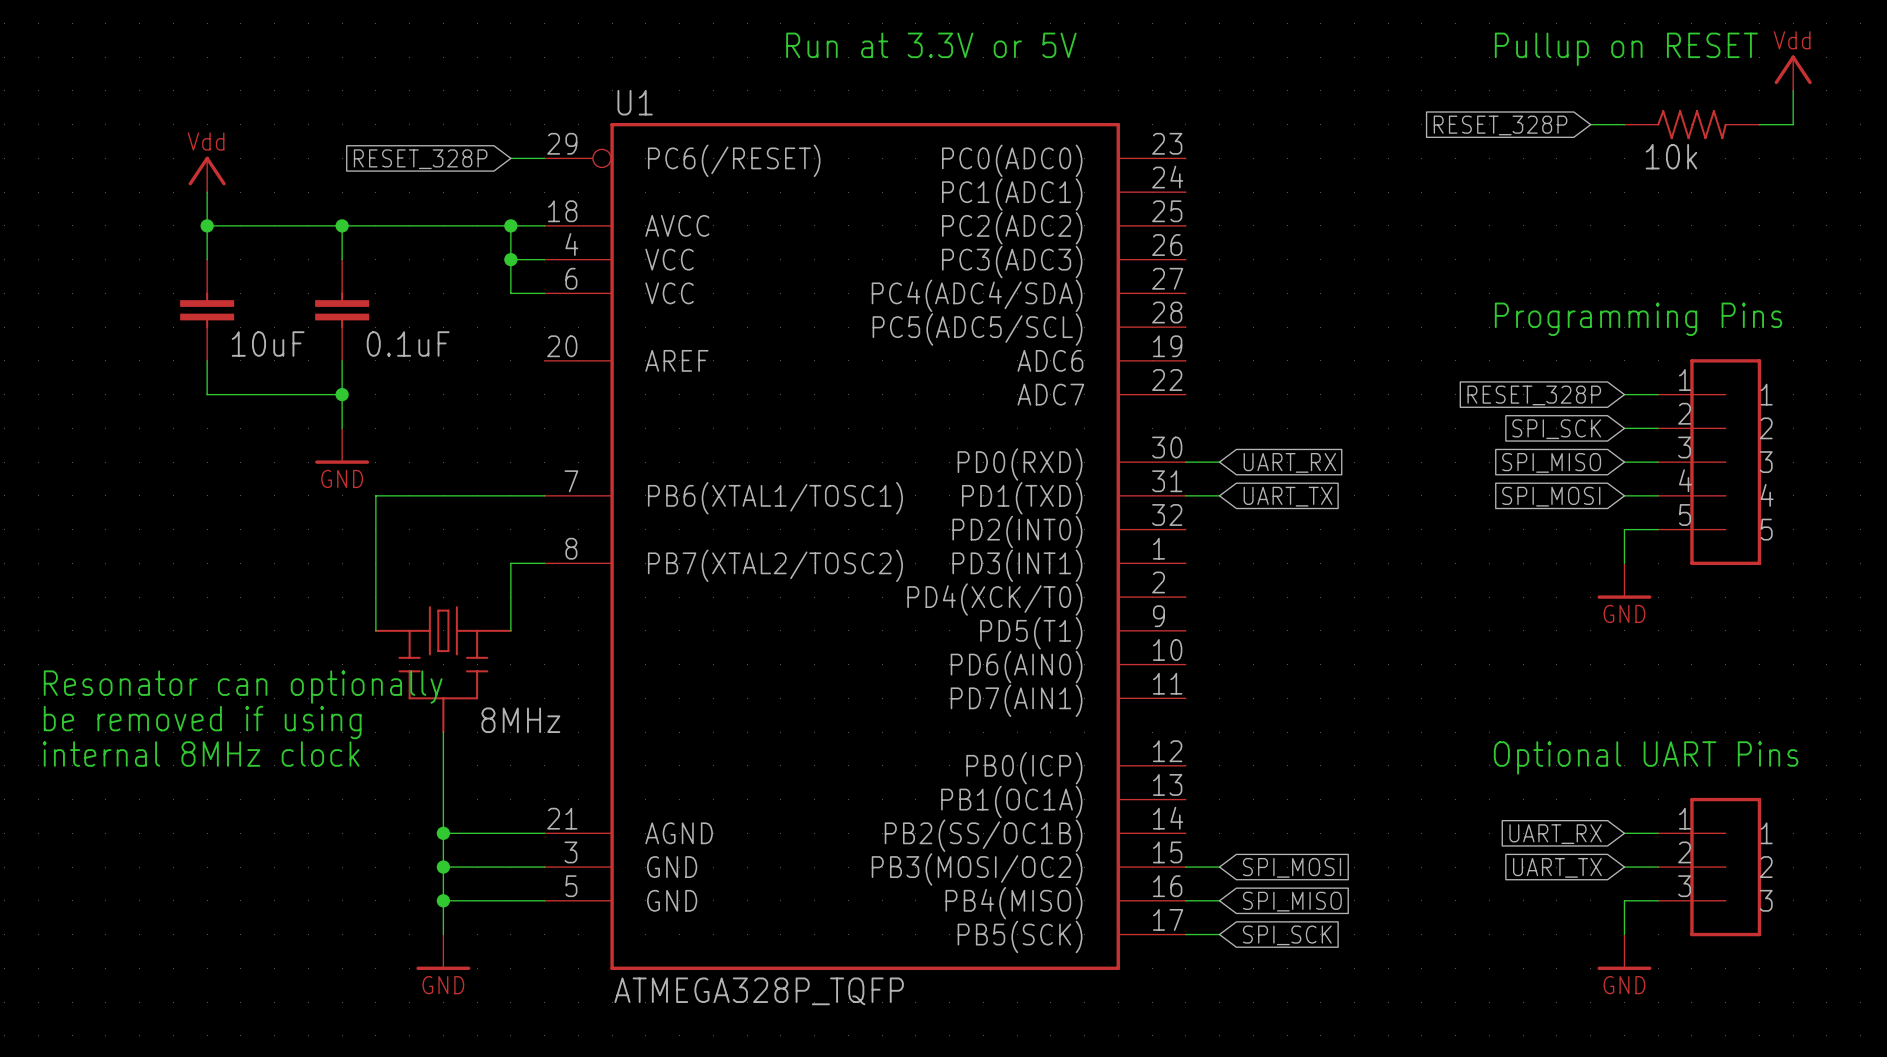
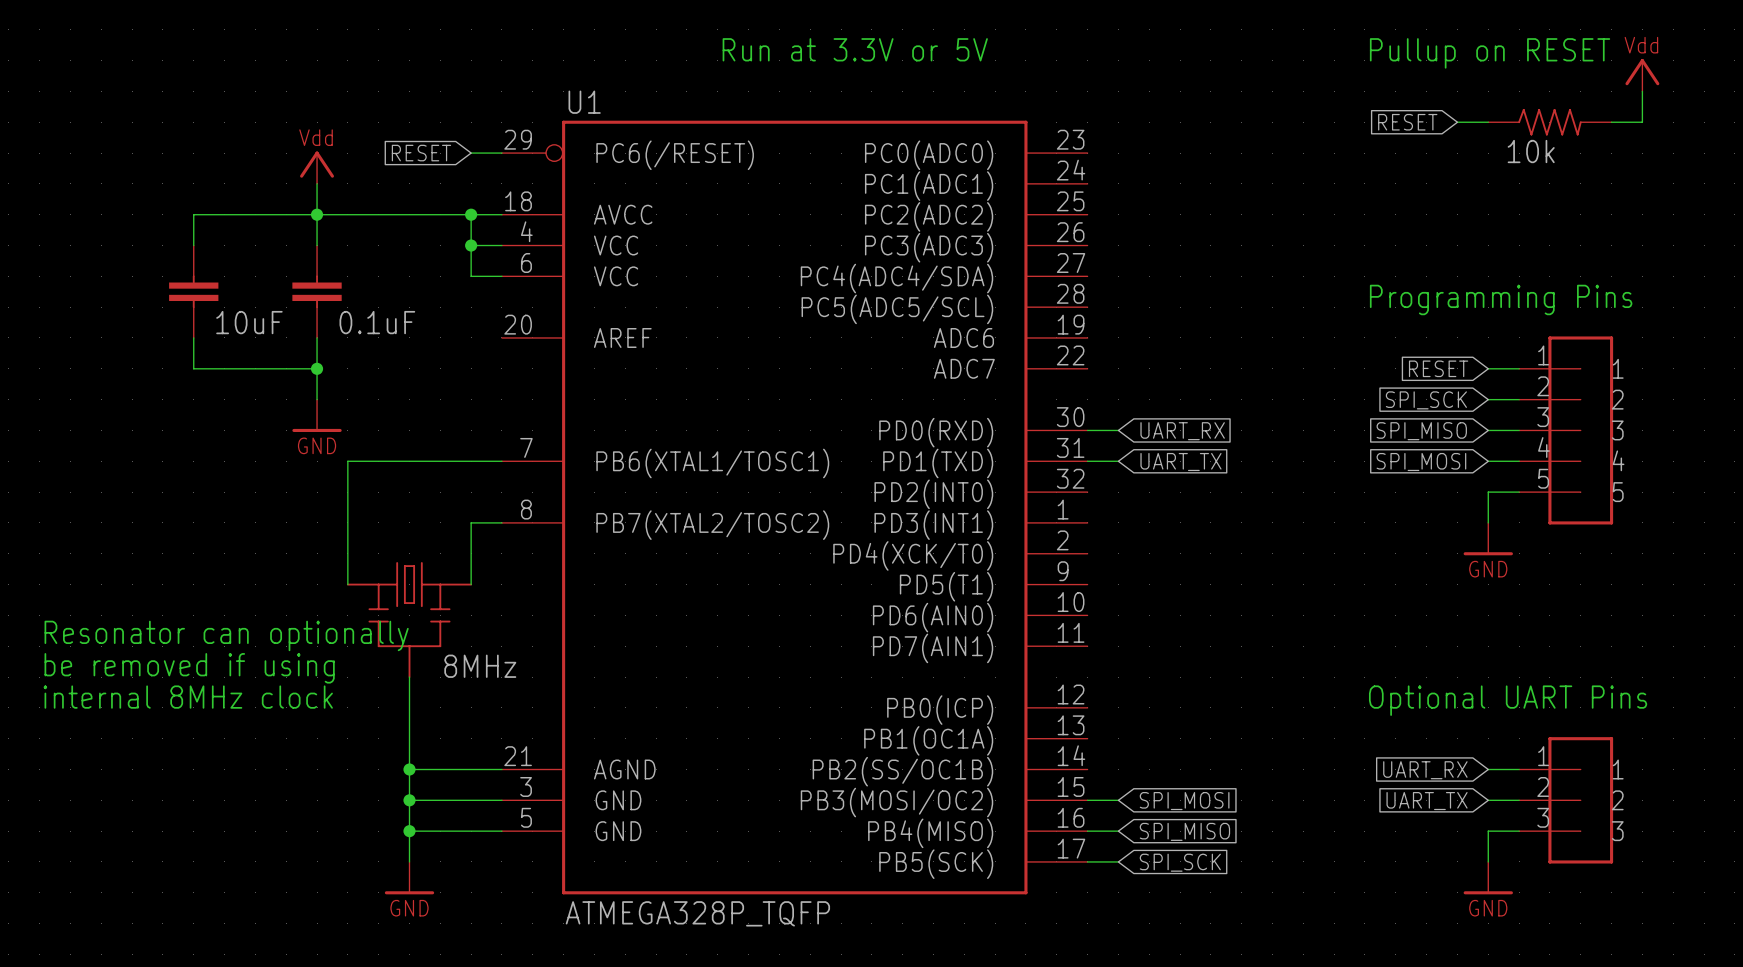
global label: RESET_328P (1500, 125) -> RESET (1407, 122)
global label: RESET_328P (420, 159) -> RESET (421, 153)
power symbol position: (207, 174) -> (317, 167)
wire: (207, 192) (207, 225) -> (317, 183) (317, 214)
junction: (207, 225) -> none
global label: RESET_328P (1534, 395) -> RESET (1438, 368)

